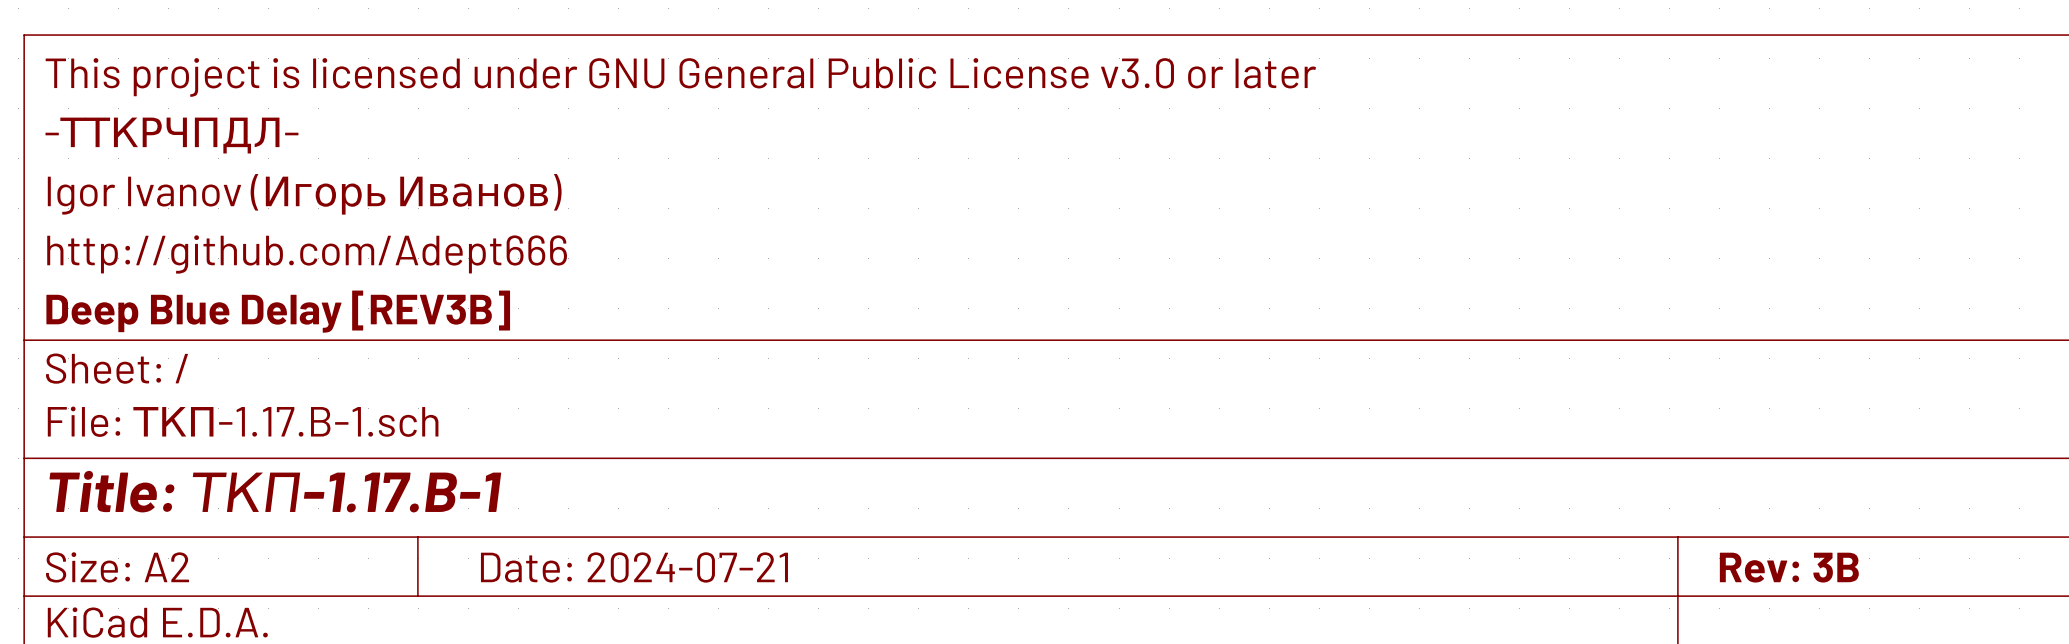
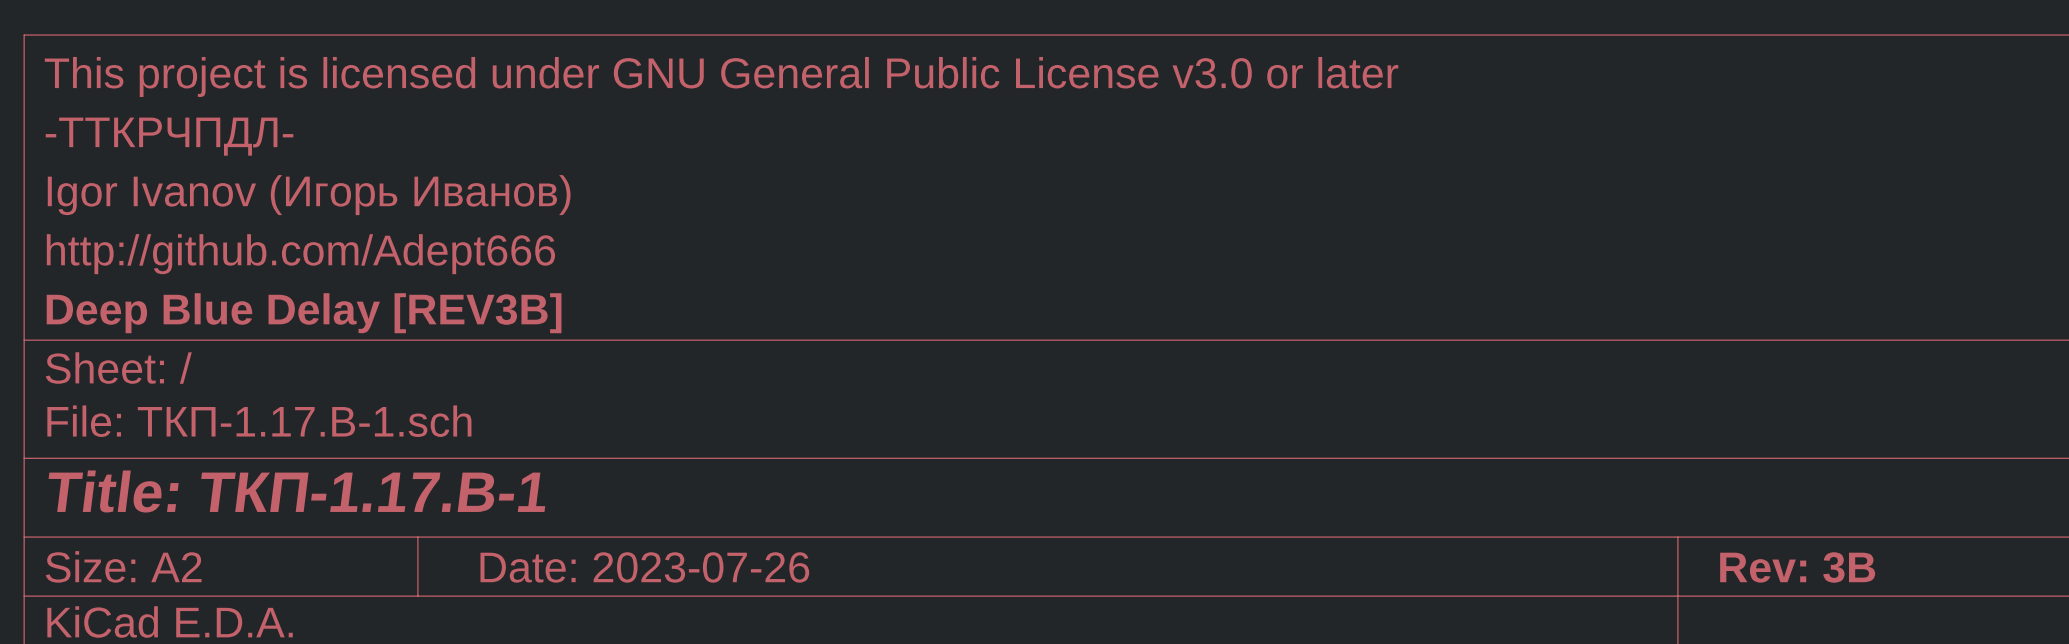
title block: Date: 2024-07-21 (634, 567) -> Date: 2023-07-26 (644, 567)

